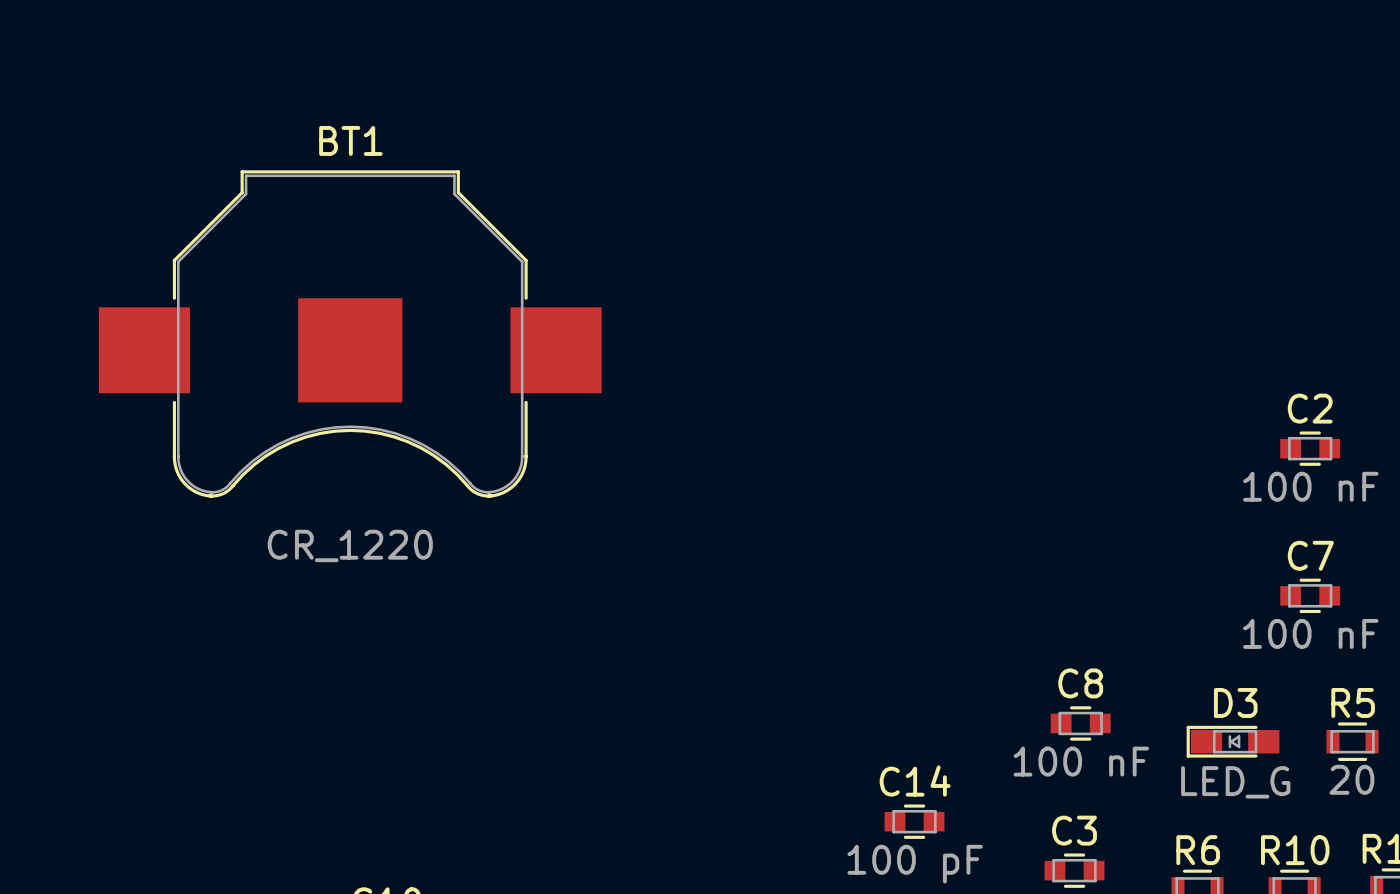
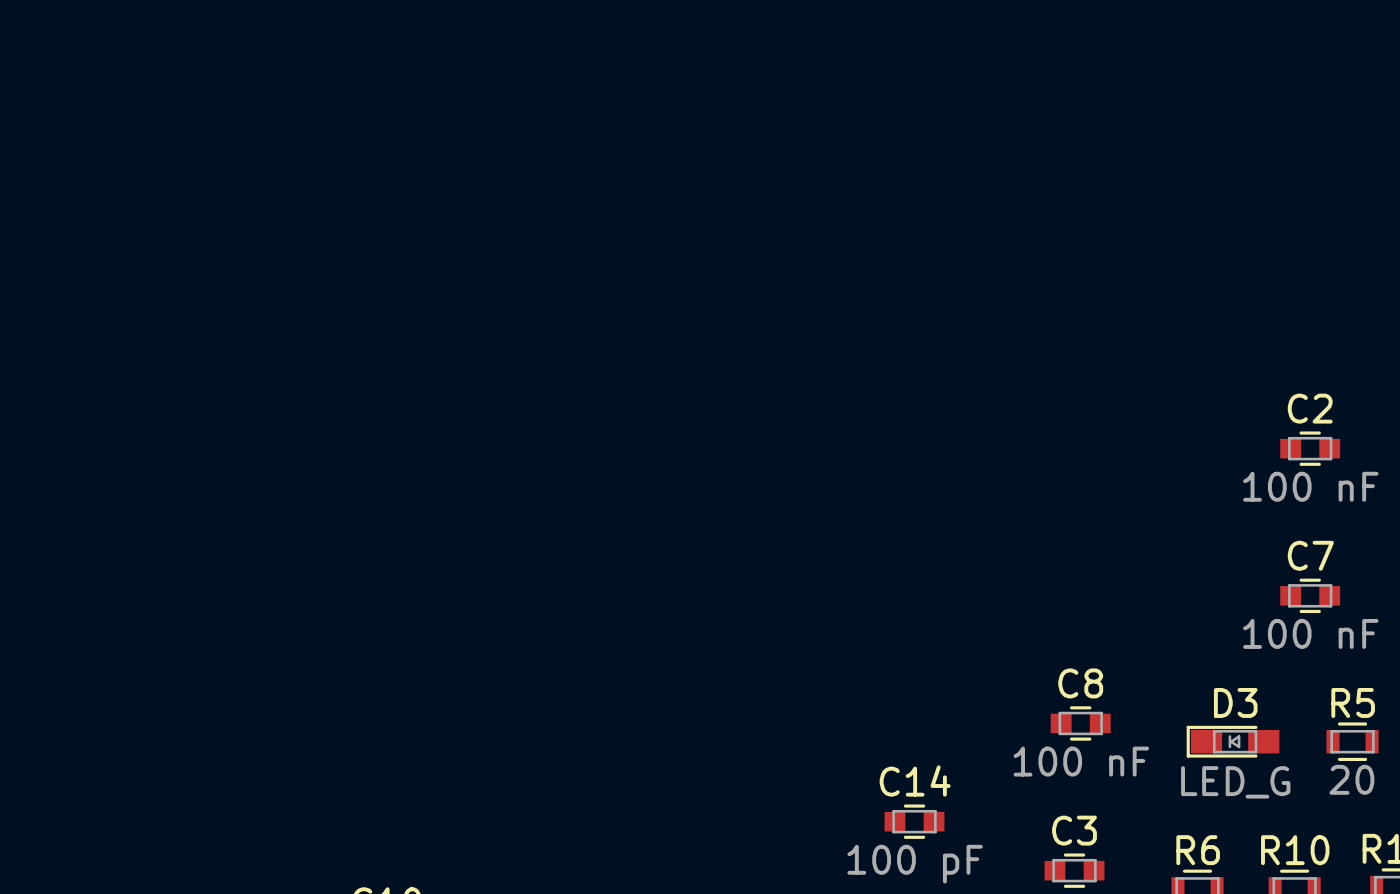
BT1: CR_1220 (350, 334) -> none

